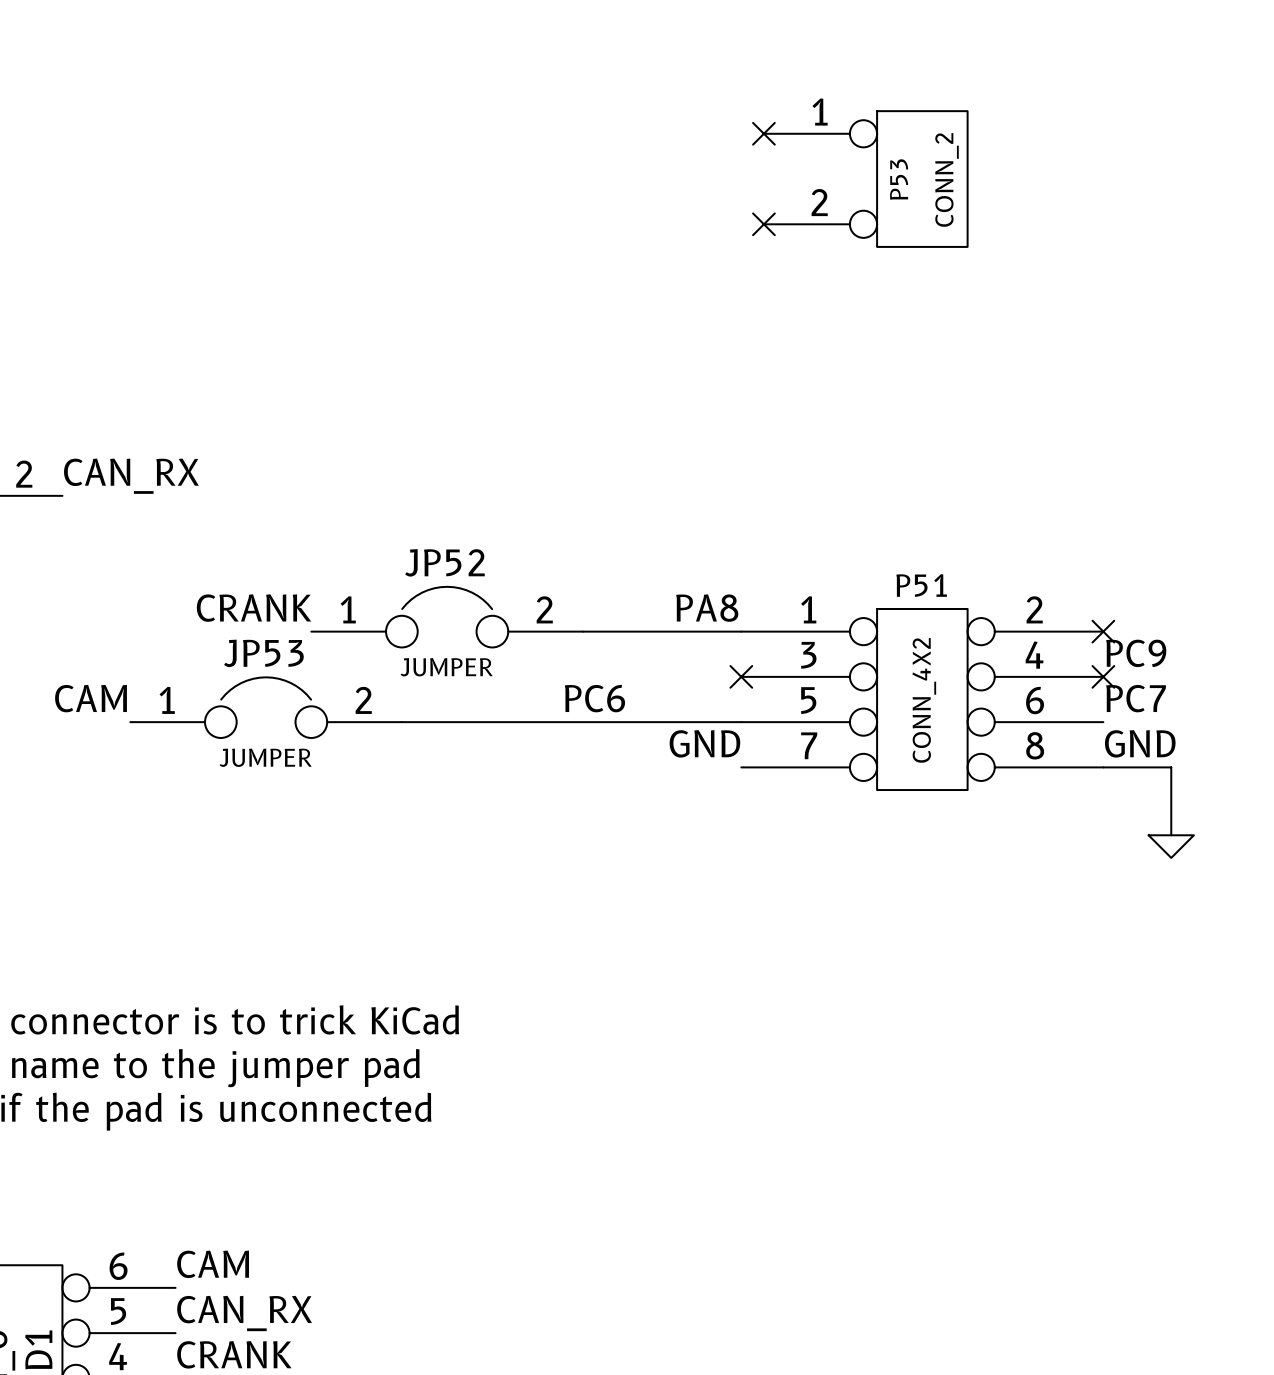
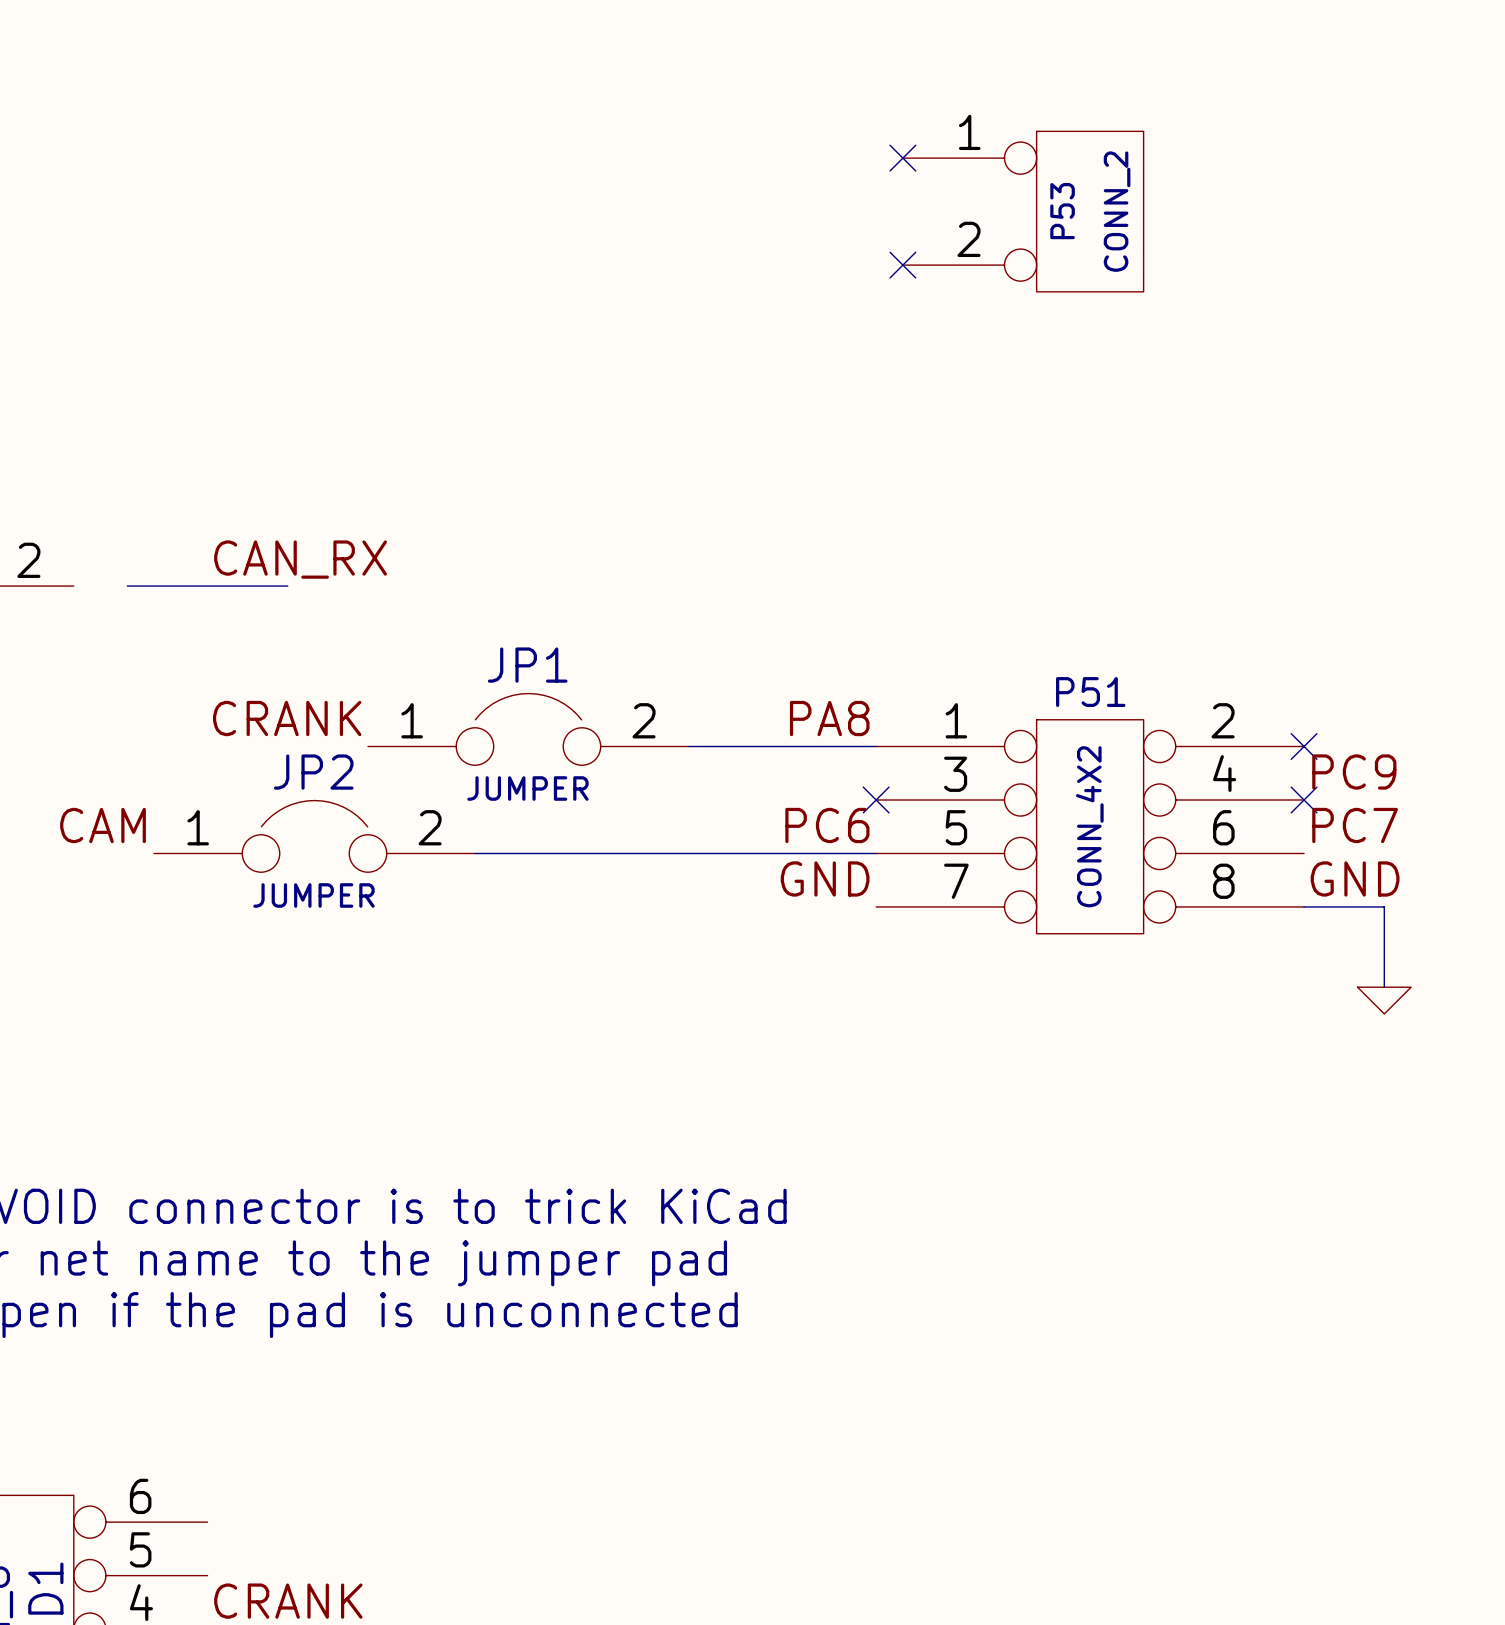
label position: CAN_RX (131, 476) -> CAN_RX (300, 559)
wire: none -> (127, 586) (287, 586)
JP52 name: JP52 (444, 562) -> JP1 (527, 665)
JP53 name: JP53 (263, 653) -> JP2 (313, 772)
label position: PC6 (594, 698) -> PC6 (827, 825)
label: CAM (213, 1264) -> none
label: CAN_RX (244, 1313) -> none

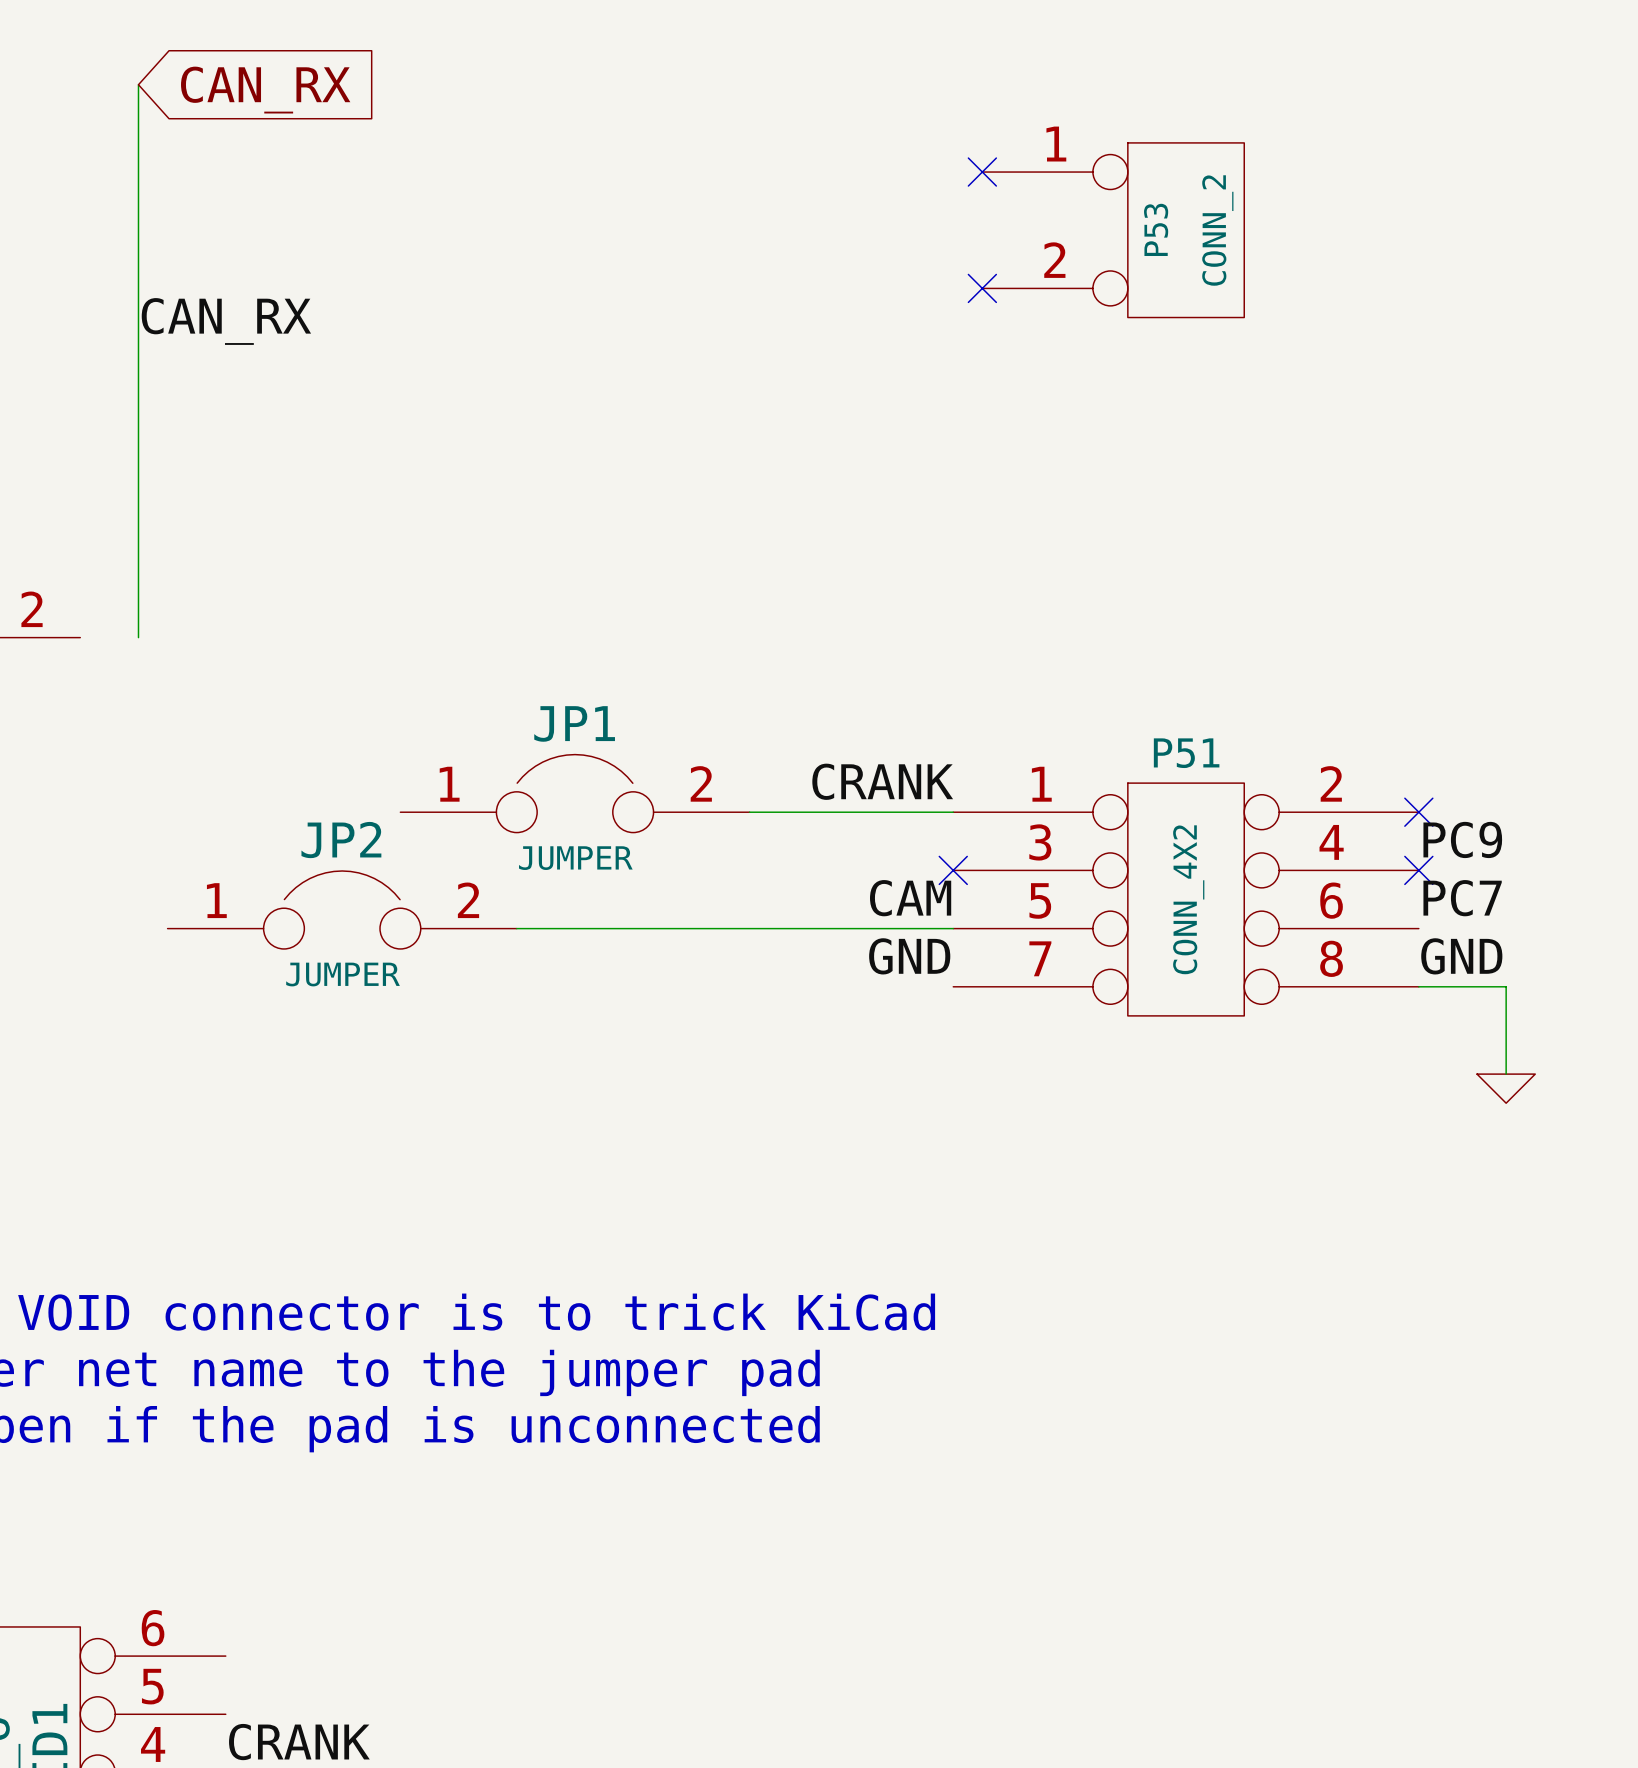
global label: none -> CAN_RX (265, 90)
label position: CAN_RX (300, 559) -> CAN_RX (226, 321)
wire: (127, 586) (287, 586) -> (138, 637) (138, 84)
label: CRANK (287, 718) -> none
label: PA8 (829, 718) -> CRANK (882, 781)
label: CAM (103, 825) -> none
label: PC6 (827, 825) -> CAM (910, 898)

